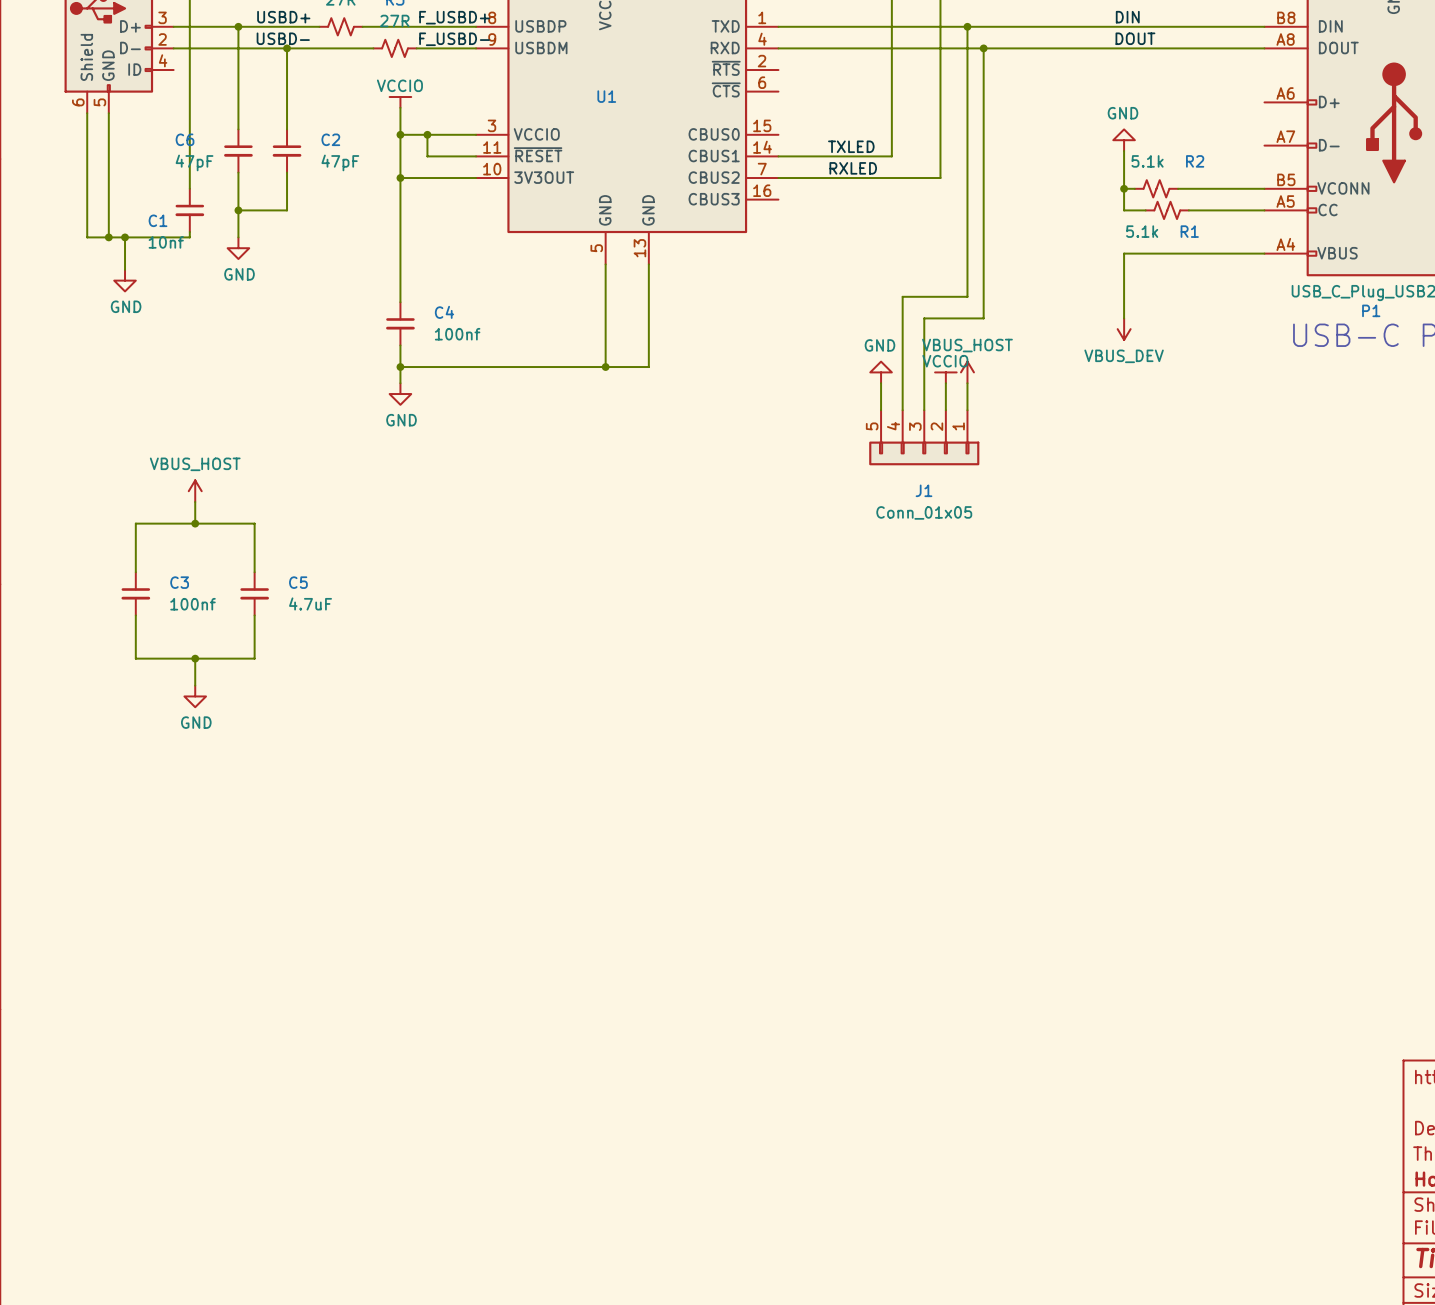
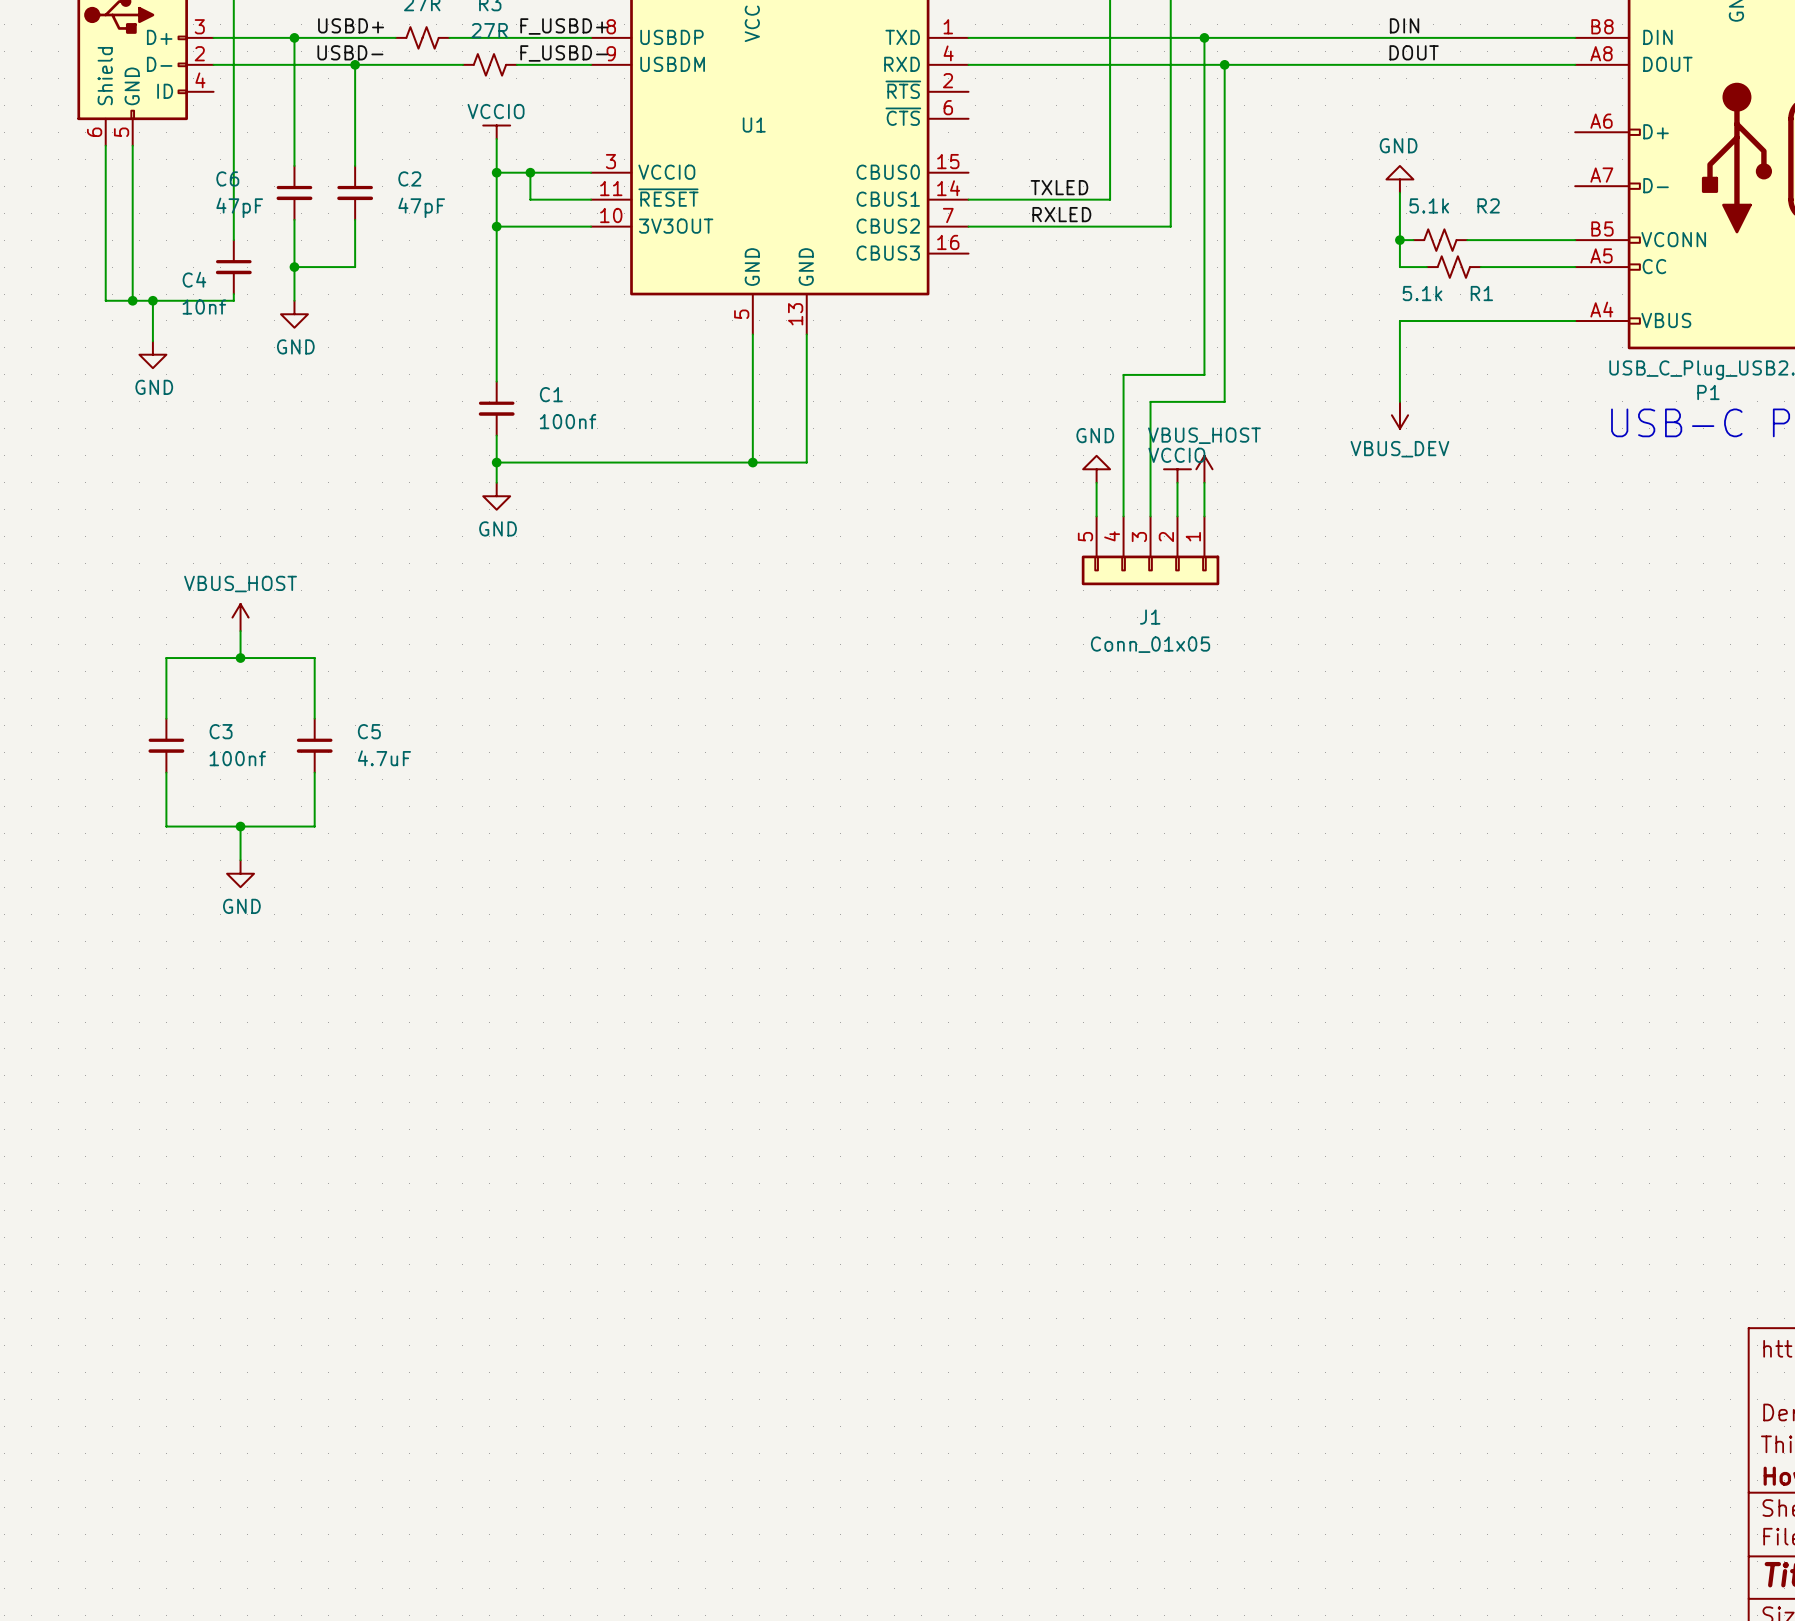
C1 name: C1 (158, 220) -> C4 (194, 279)
C4 name: C4 (444, 312) -> C1 (551, 394)

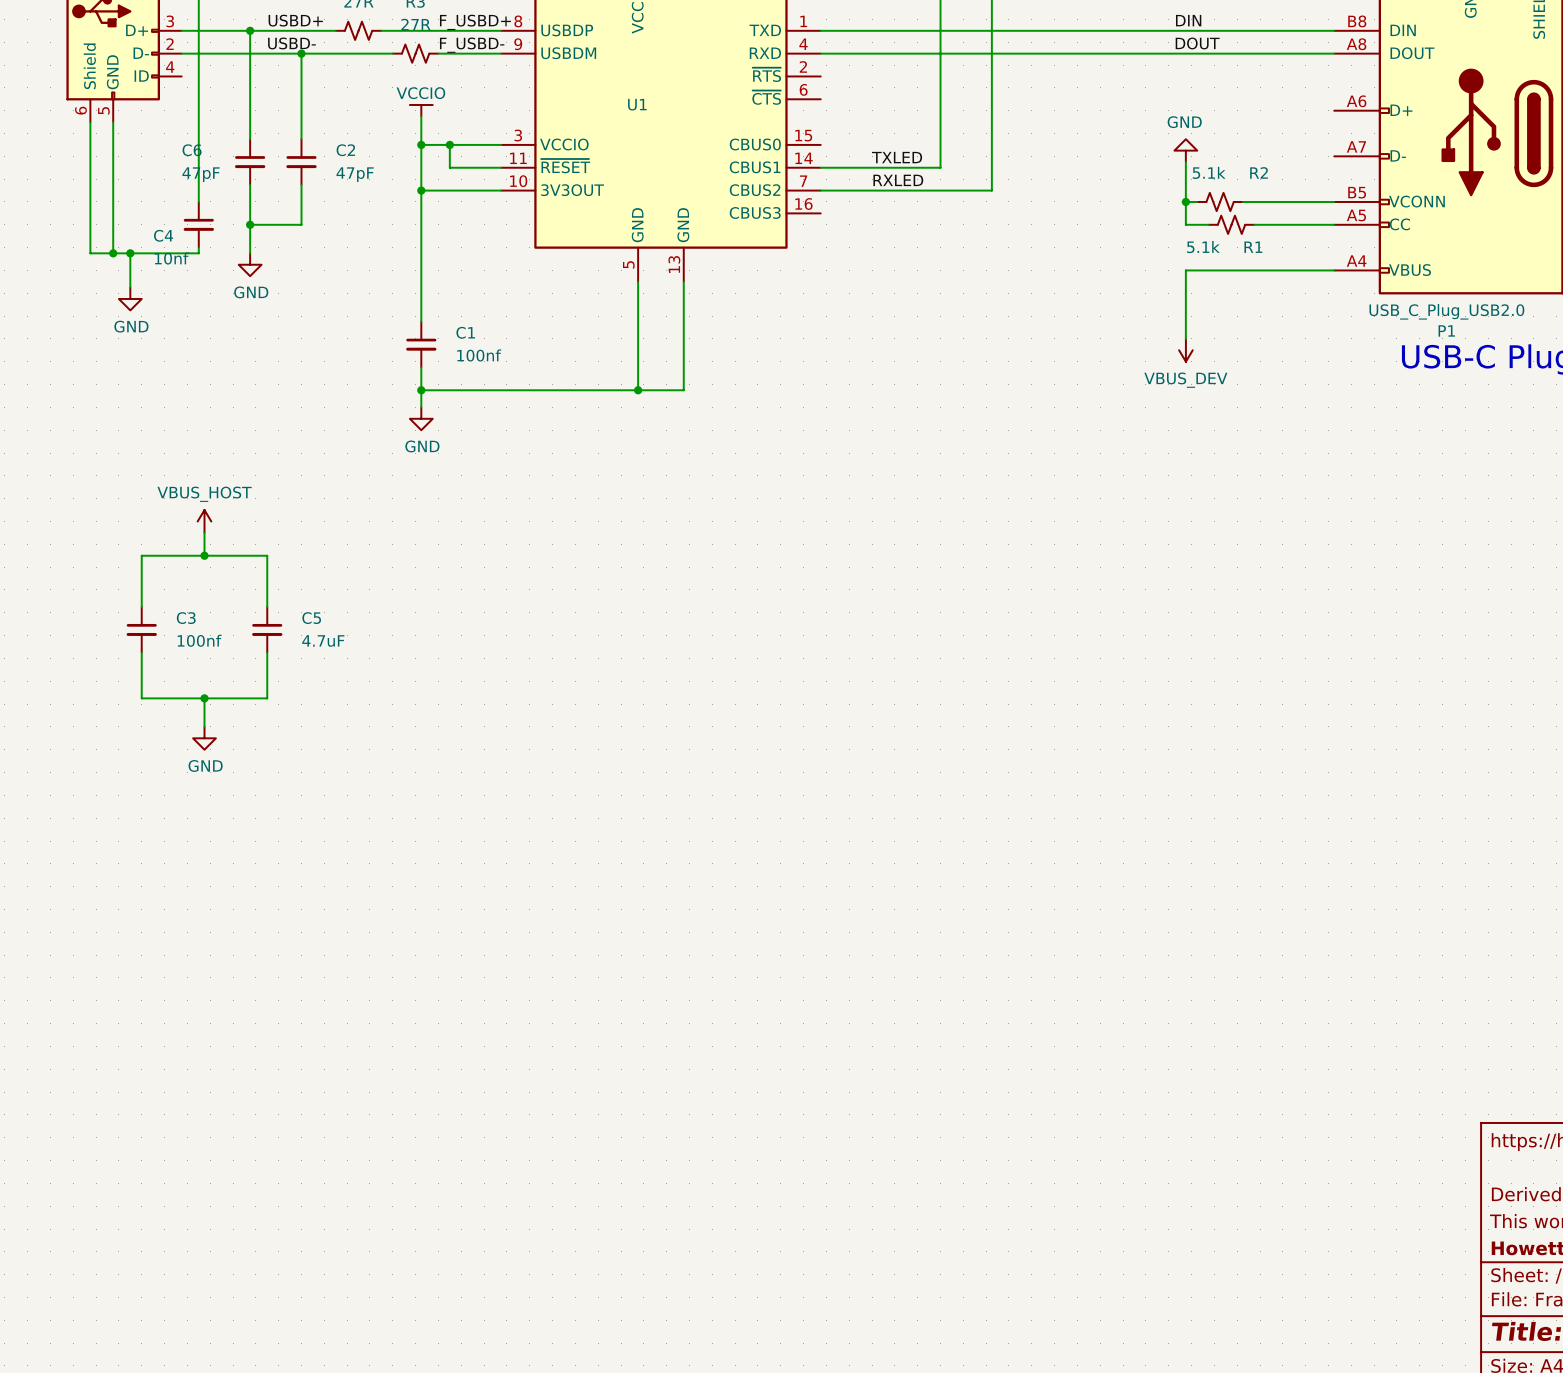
wire: (1204, 37) (1204, 374) (1123, 374) (1123, 516) -> none
junction: (1204, 37) -> none
wire: (1224, 64) (1224, 401) (1150, 401) (1150, 516) -> none
junction: (1224, 64) -> none
power symbol: GND (1096, 469) -> none
power symbol: VBUS_HOST (1204, 469) -> none
power symbol: VCCIO (1177, 476) -> none
wire: (1096, 482) (1096, 516) -> none
wire: (1177, 482) (1177, 516) -> none
wire: (1204, 482) (1204, 516) -> none
J1: Conn_01x05 (1150, 550) -> none

